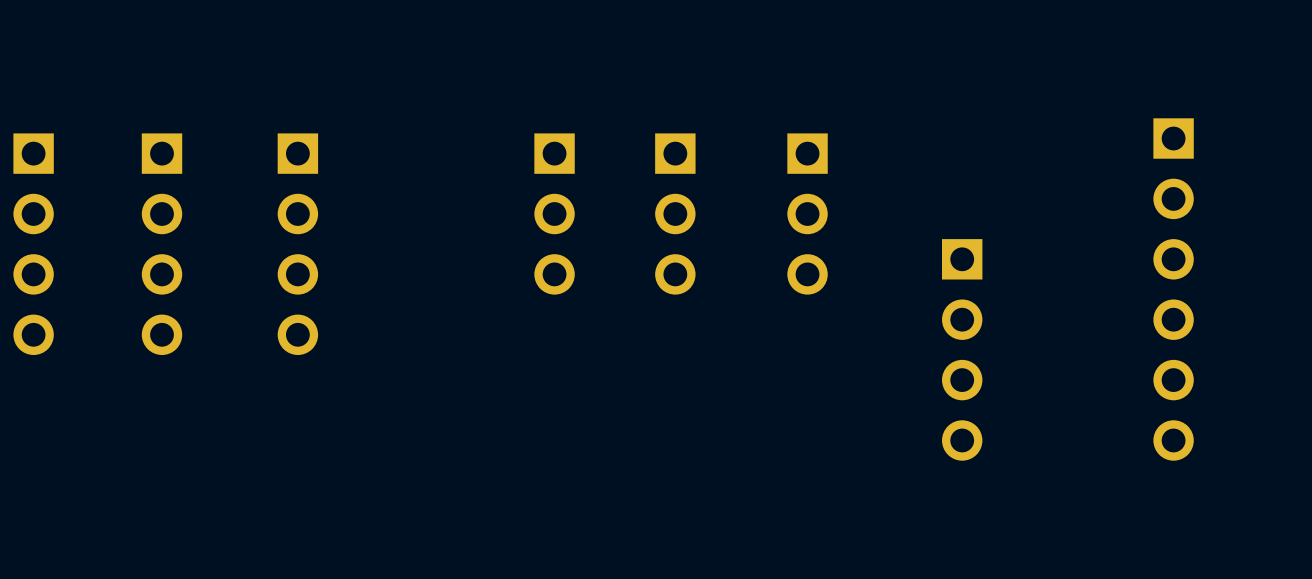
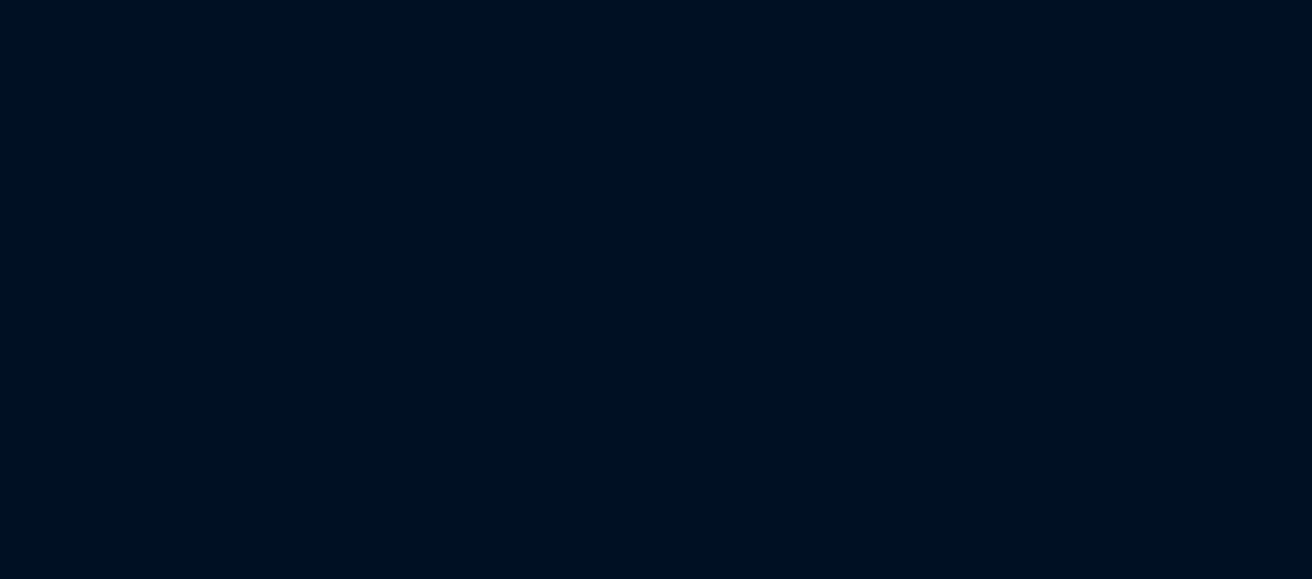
part: (554, 214) -> none
part: (675, 214) -> none
part: (807, 214) -> none
part: (33, 244) -> none
part: (162, 244) -> none
part: (297, 244) -> none
part: (1173, 289) -> none
part: (962, 349) -> none

